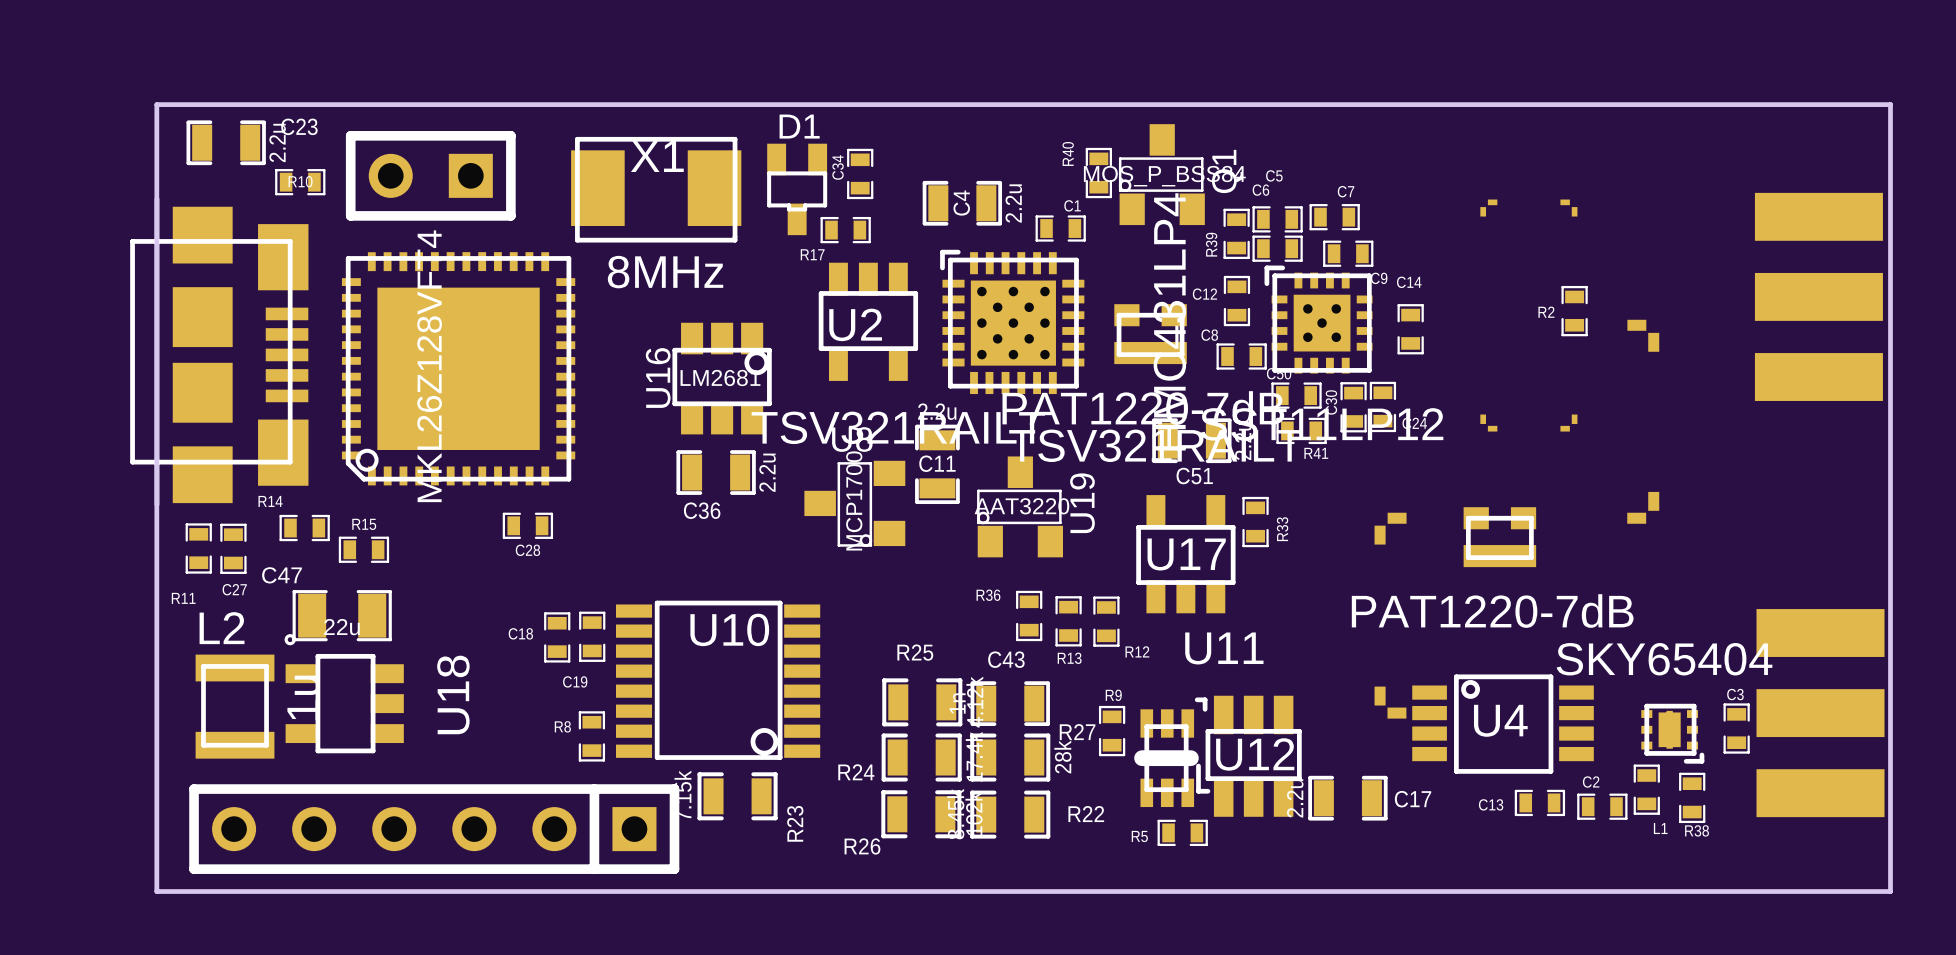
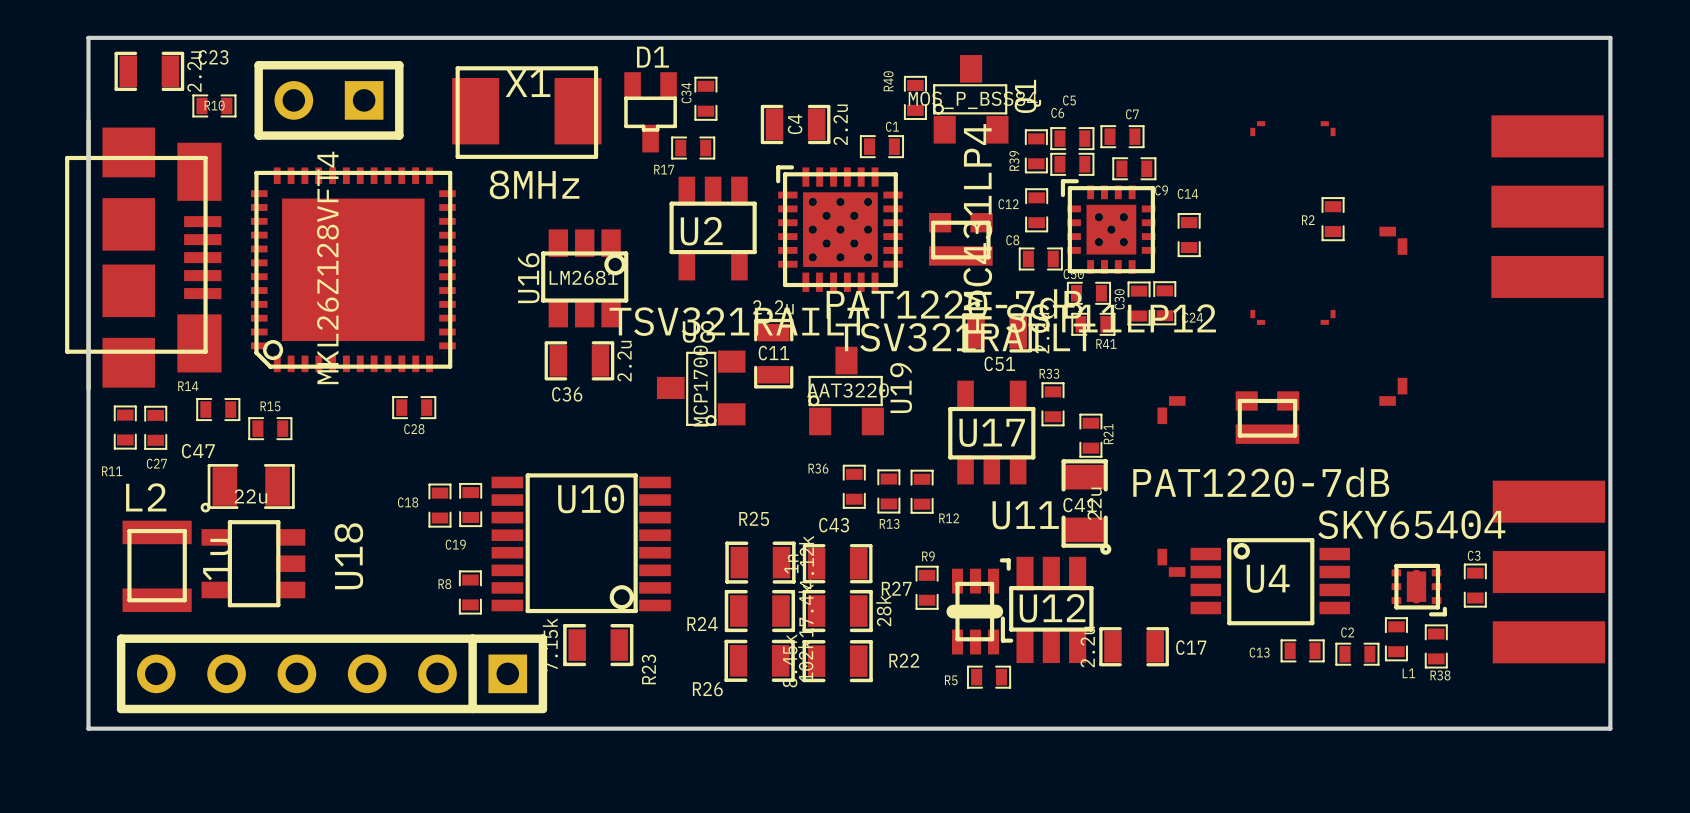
R33 name rotation: 0° (1282, 529) -> 90° clockwise (1049, 373)
R33 name position: R33 (1282, 529) -> R33 (1049, 373)
R21: none -> (1090, 435)
C41: none -> 22u (1086, 507)

